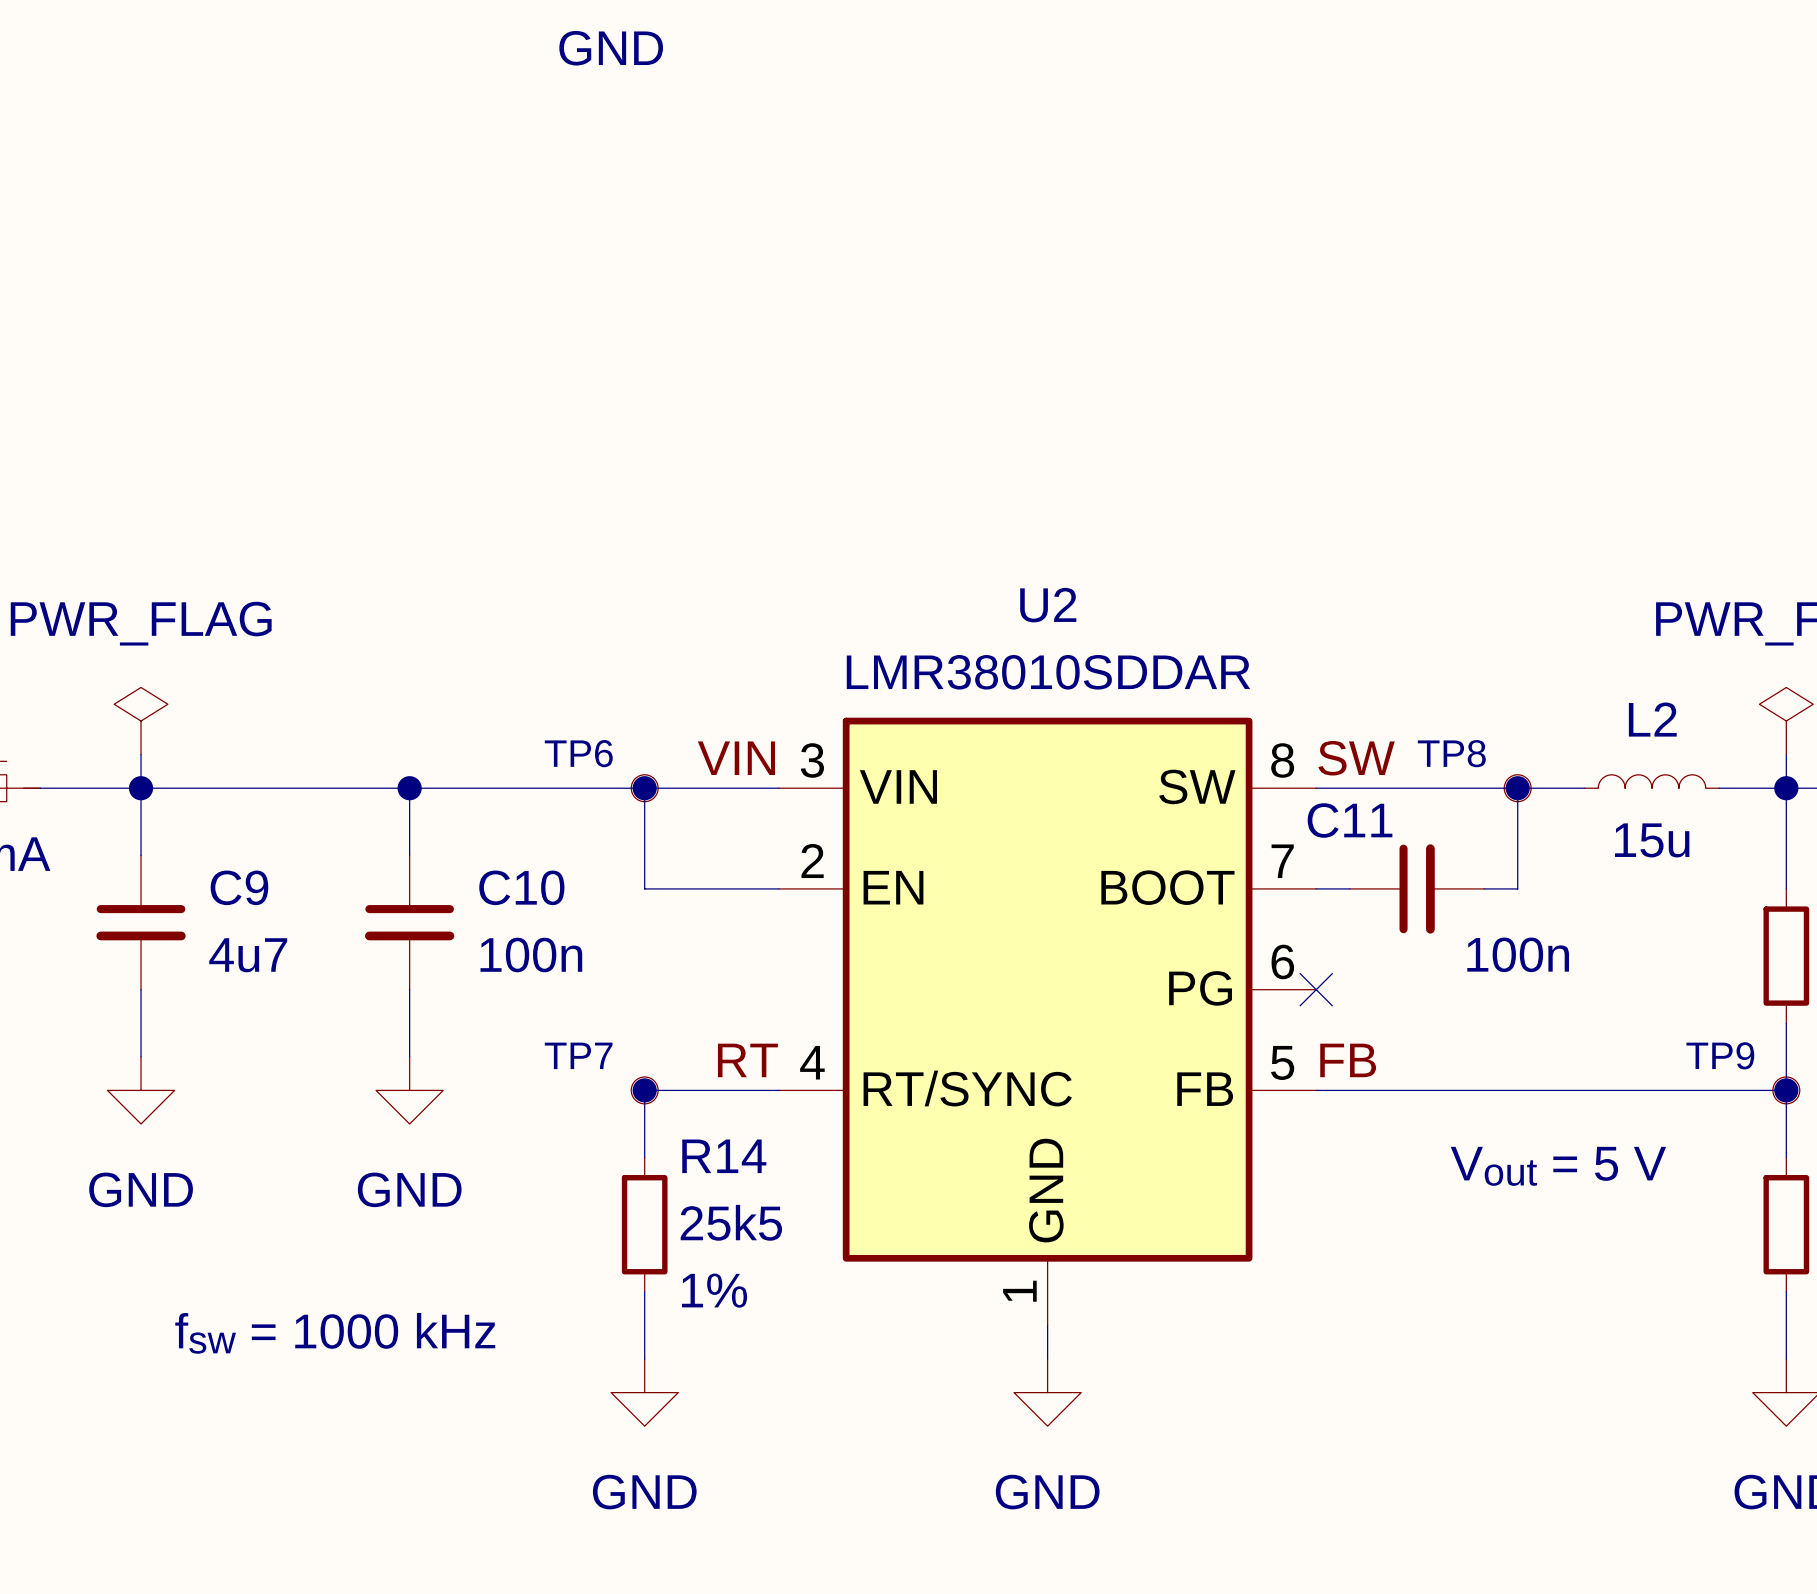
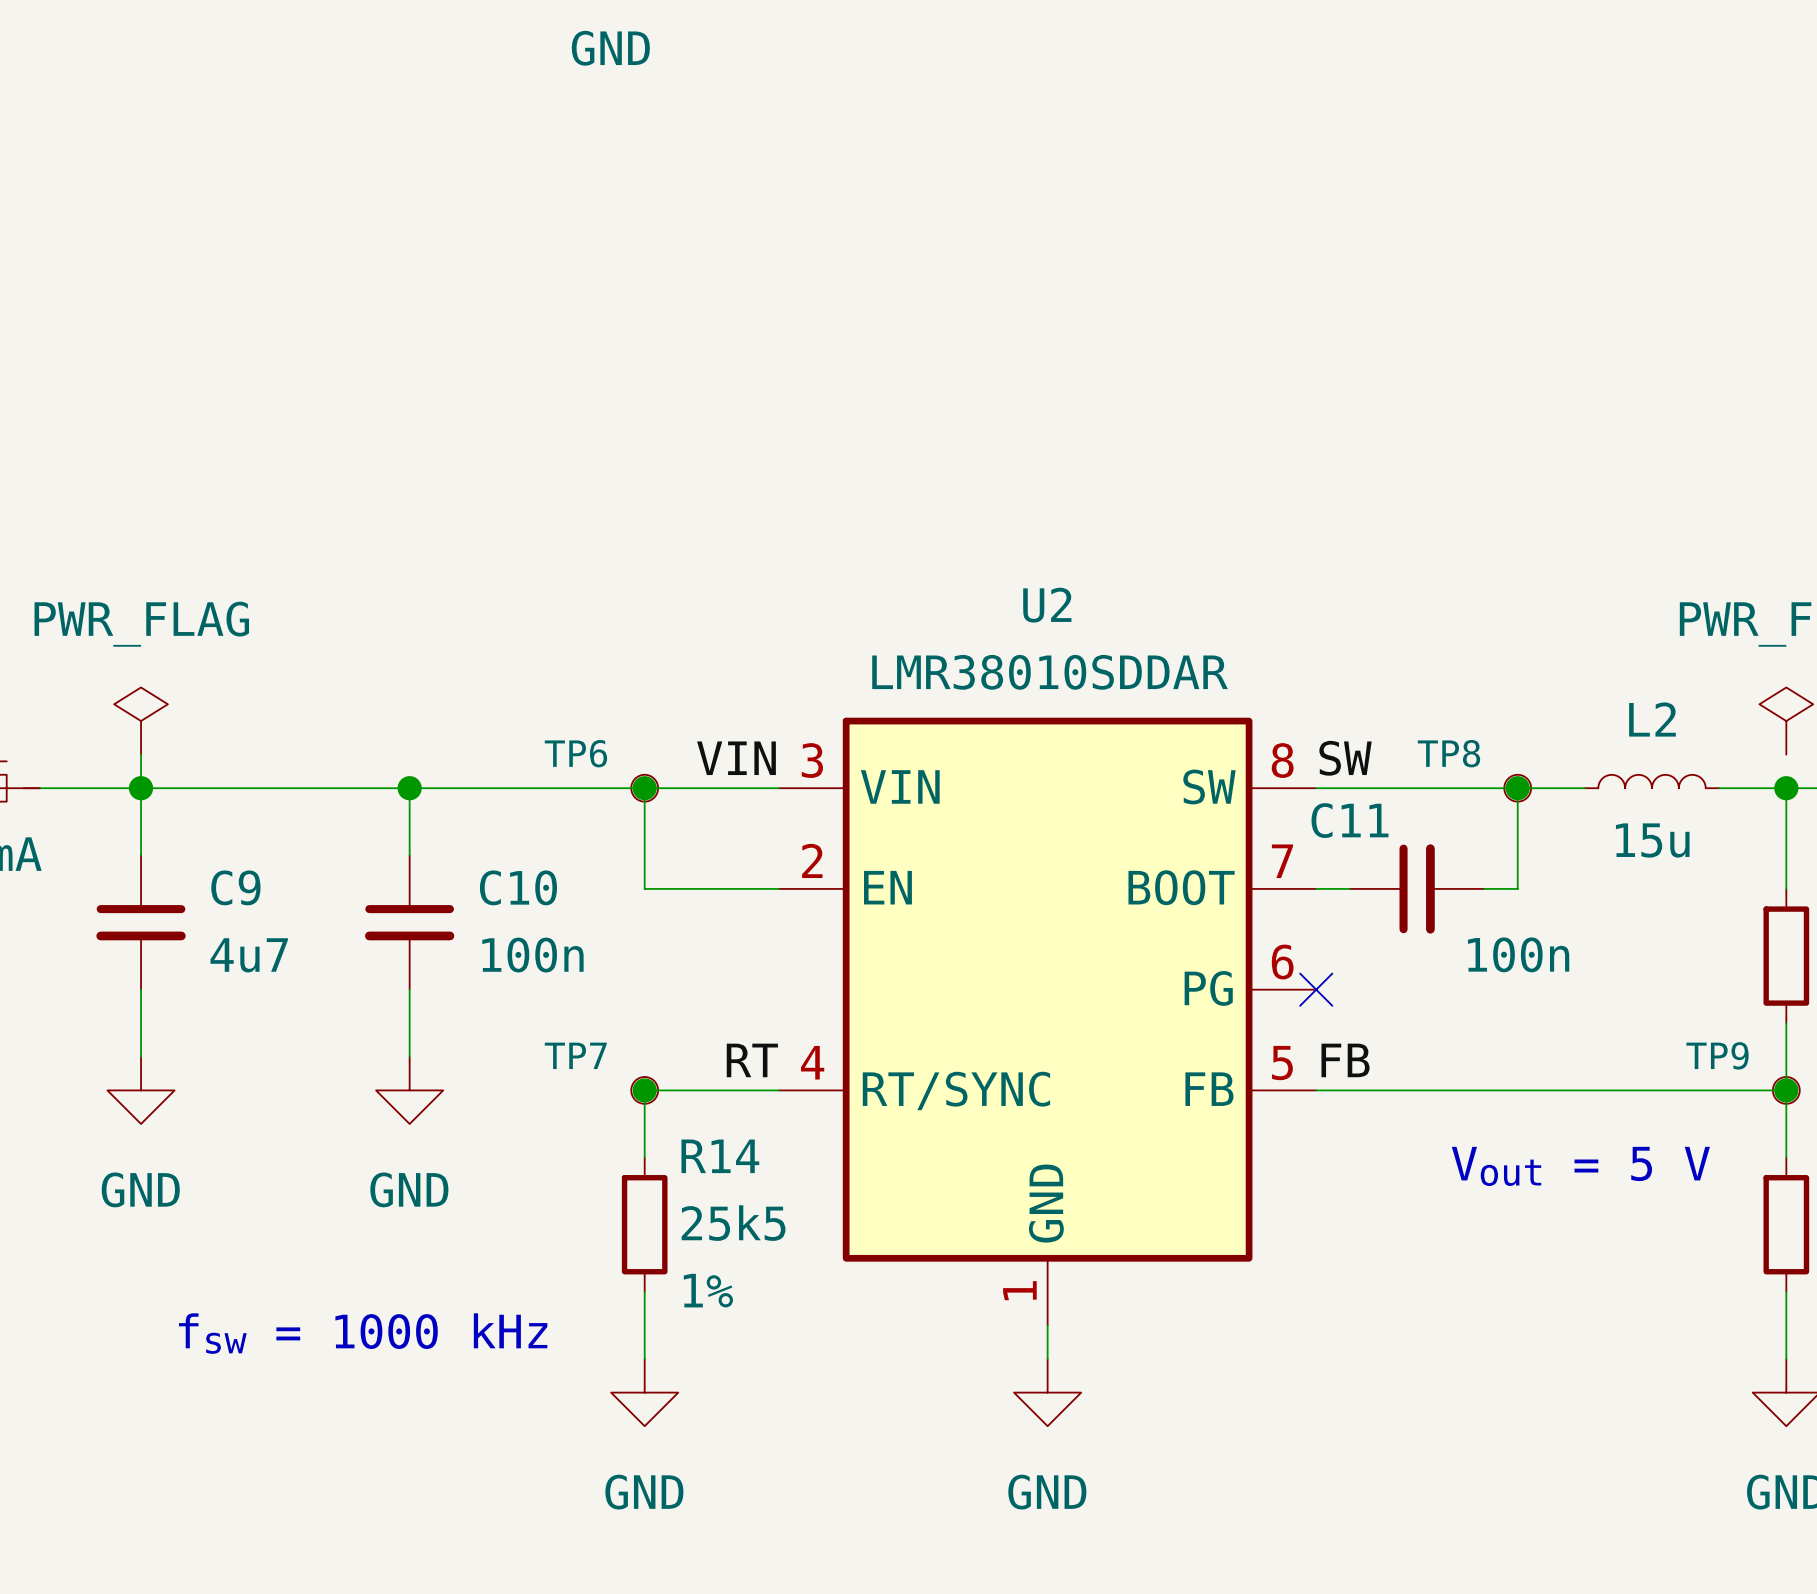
wire: (1786, 754) (1786, 788) -> none

